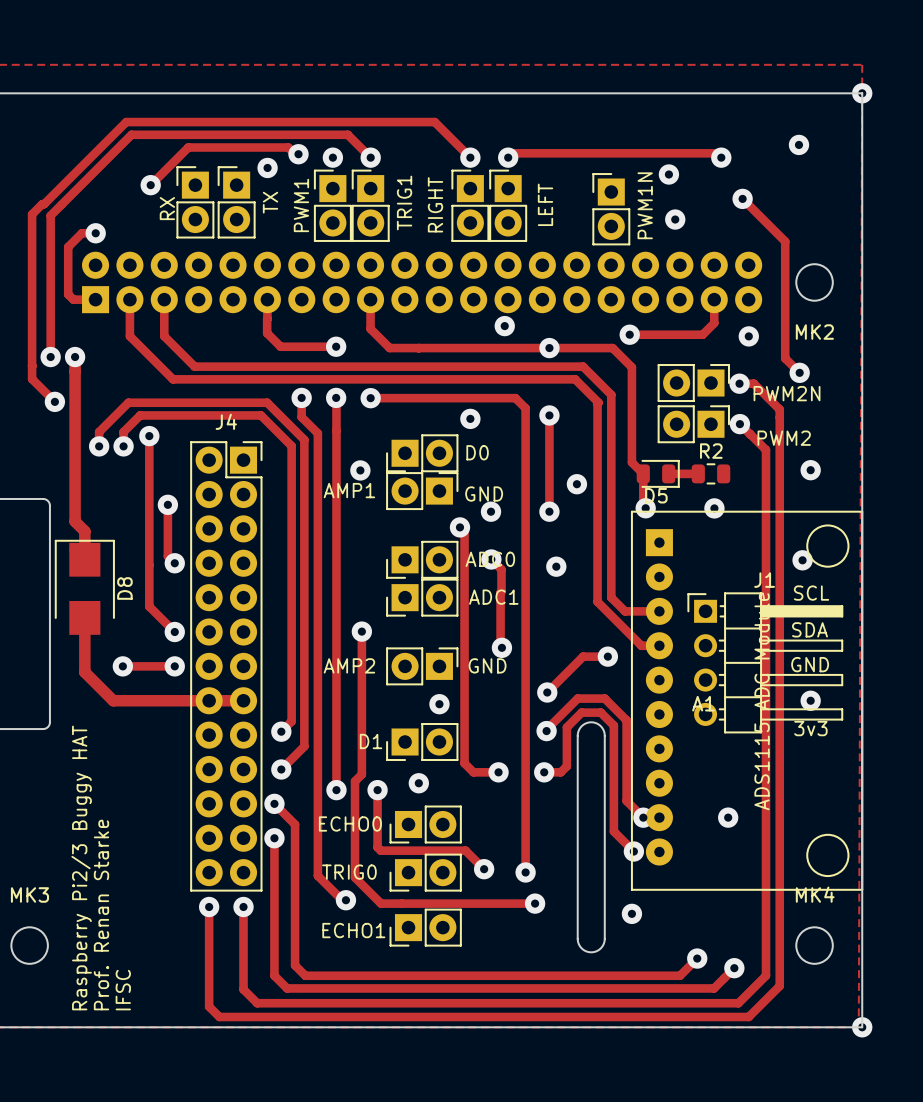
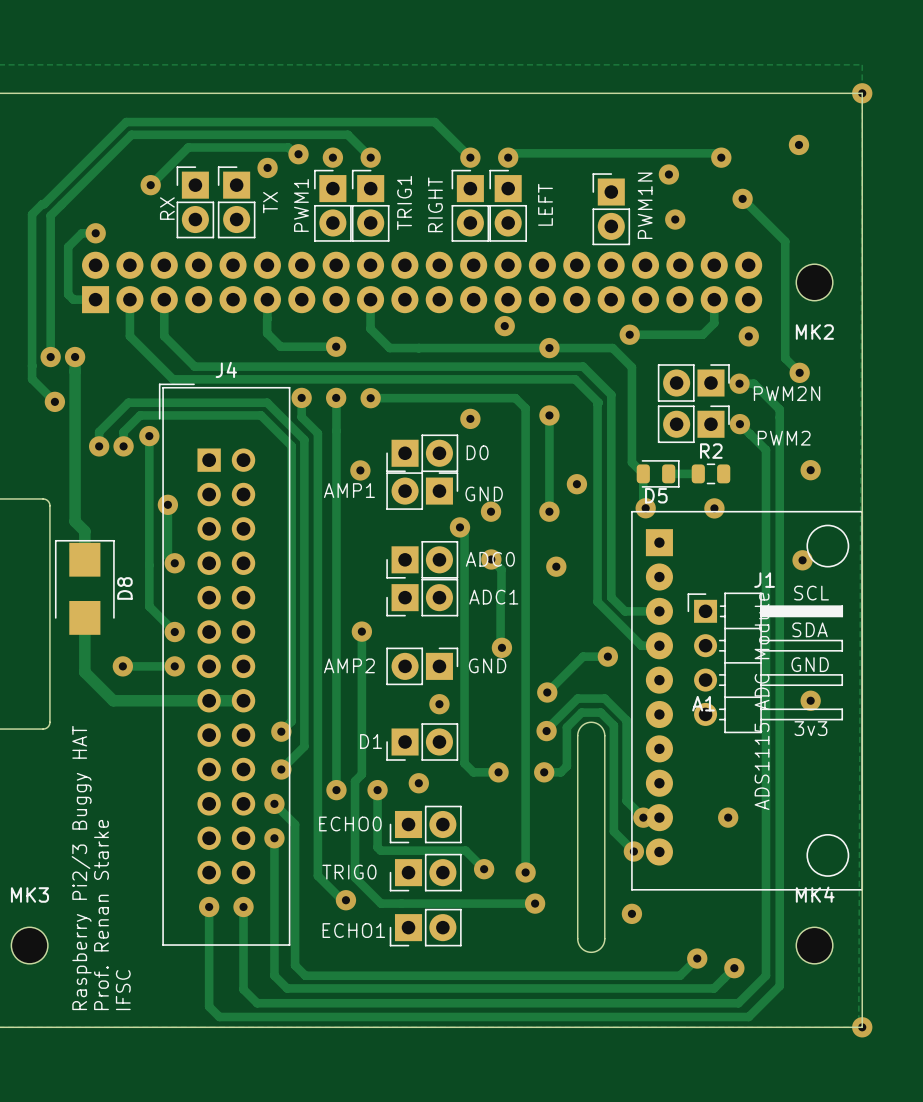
J4 name position: J4 (226, 421) -> J4 (226, 369)
J4 footprint: [190, 441, 263, 892] -> [158, 383, 291, 946]

